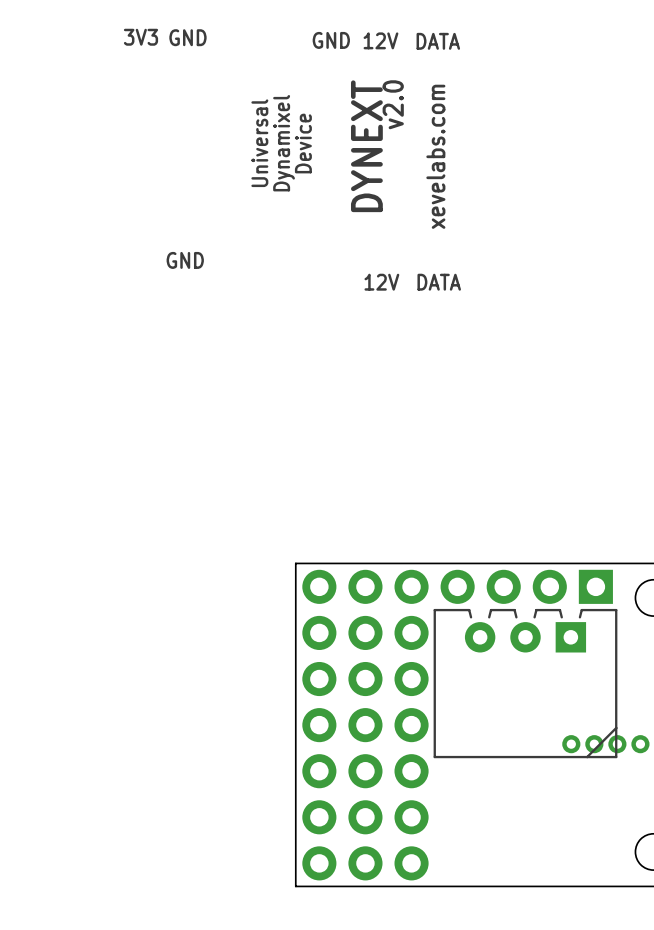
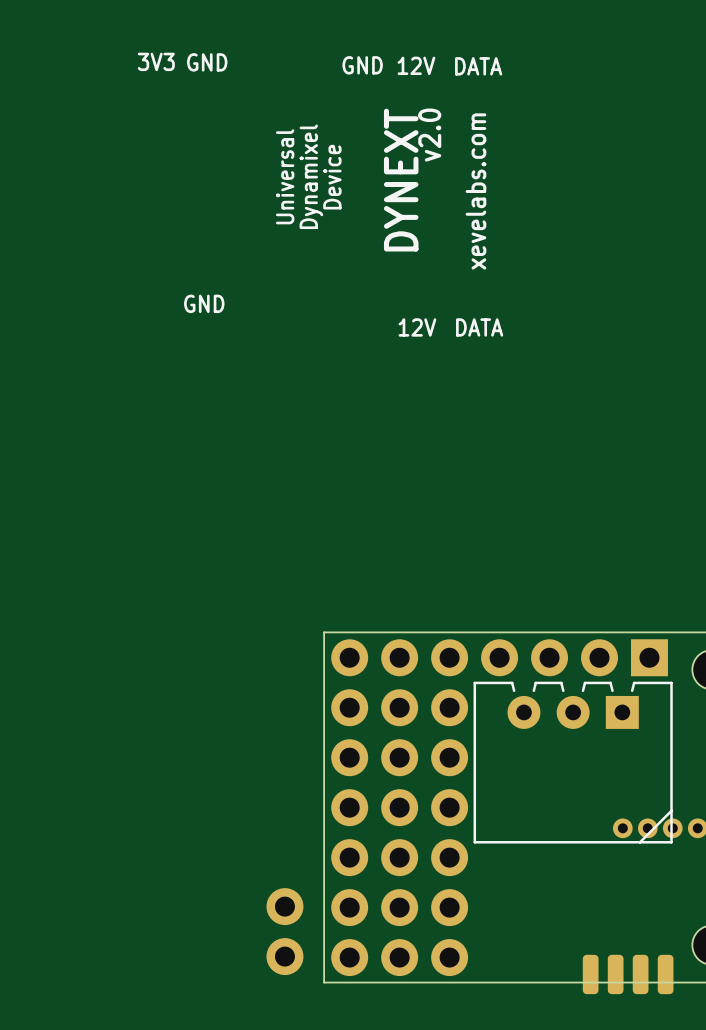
part: none -> (284, 931)
part: none -> (590, 974)
part: none -> (615, 974)
part: none -> (640, 974)
part: none -> (665, 974)

